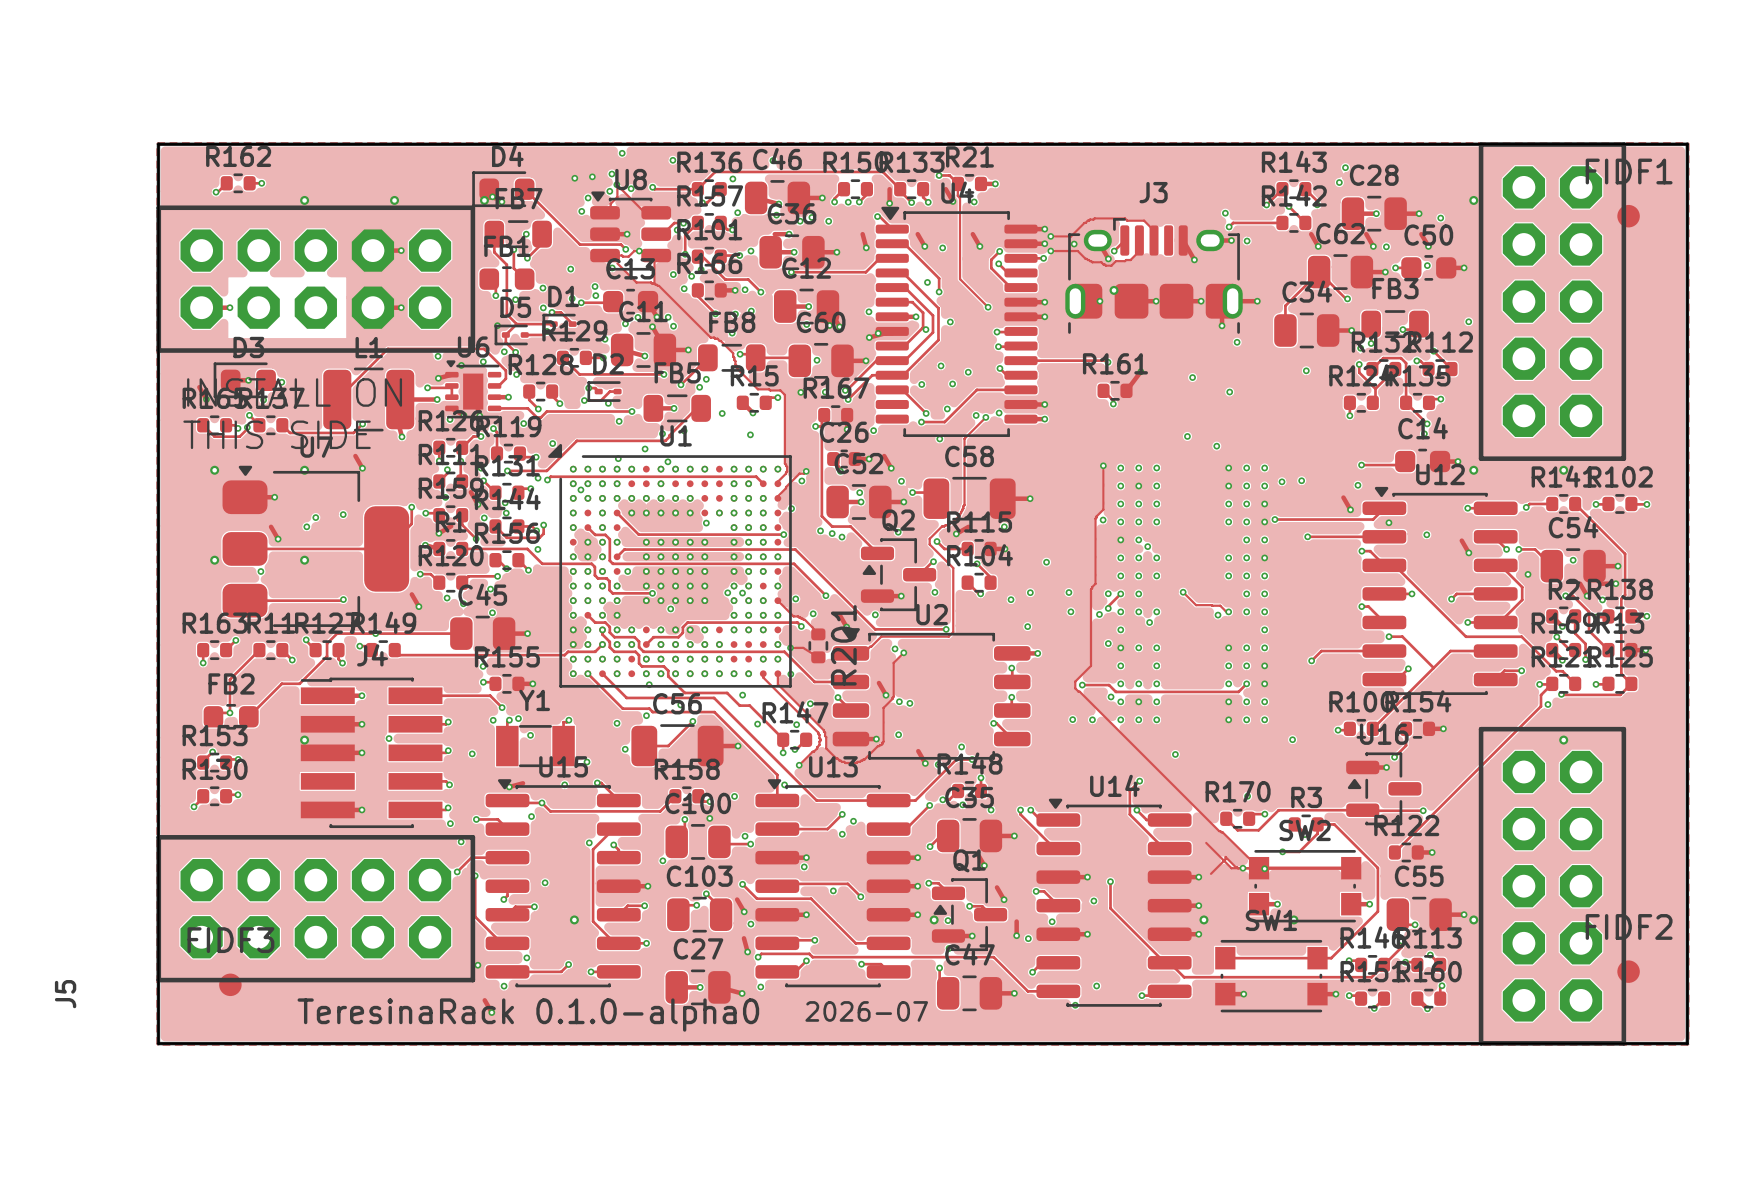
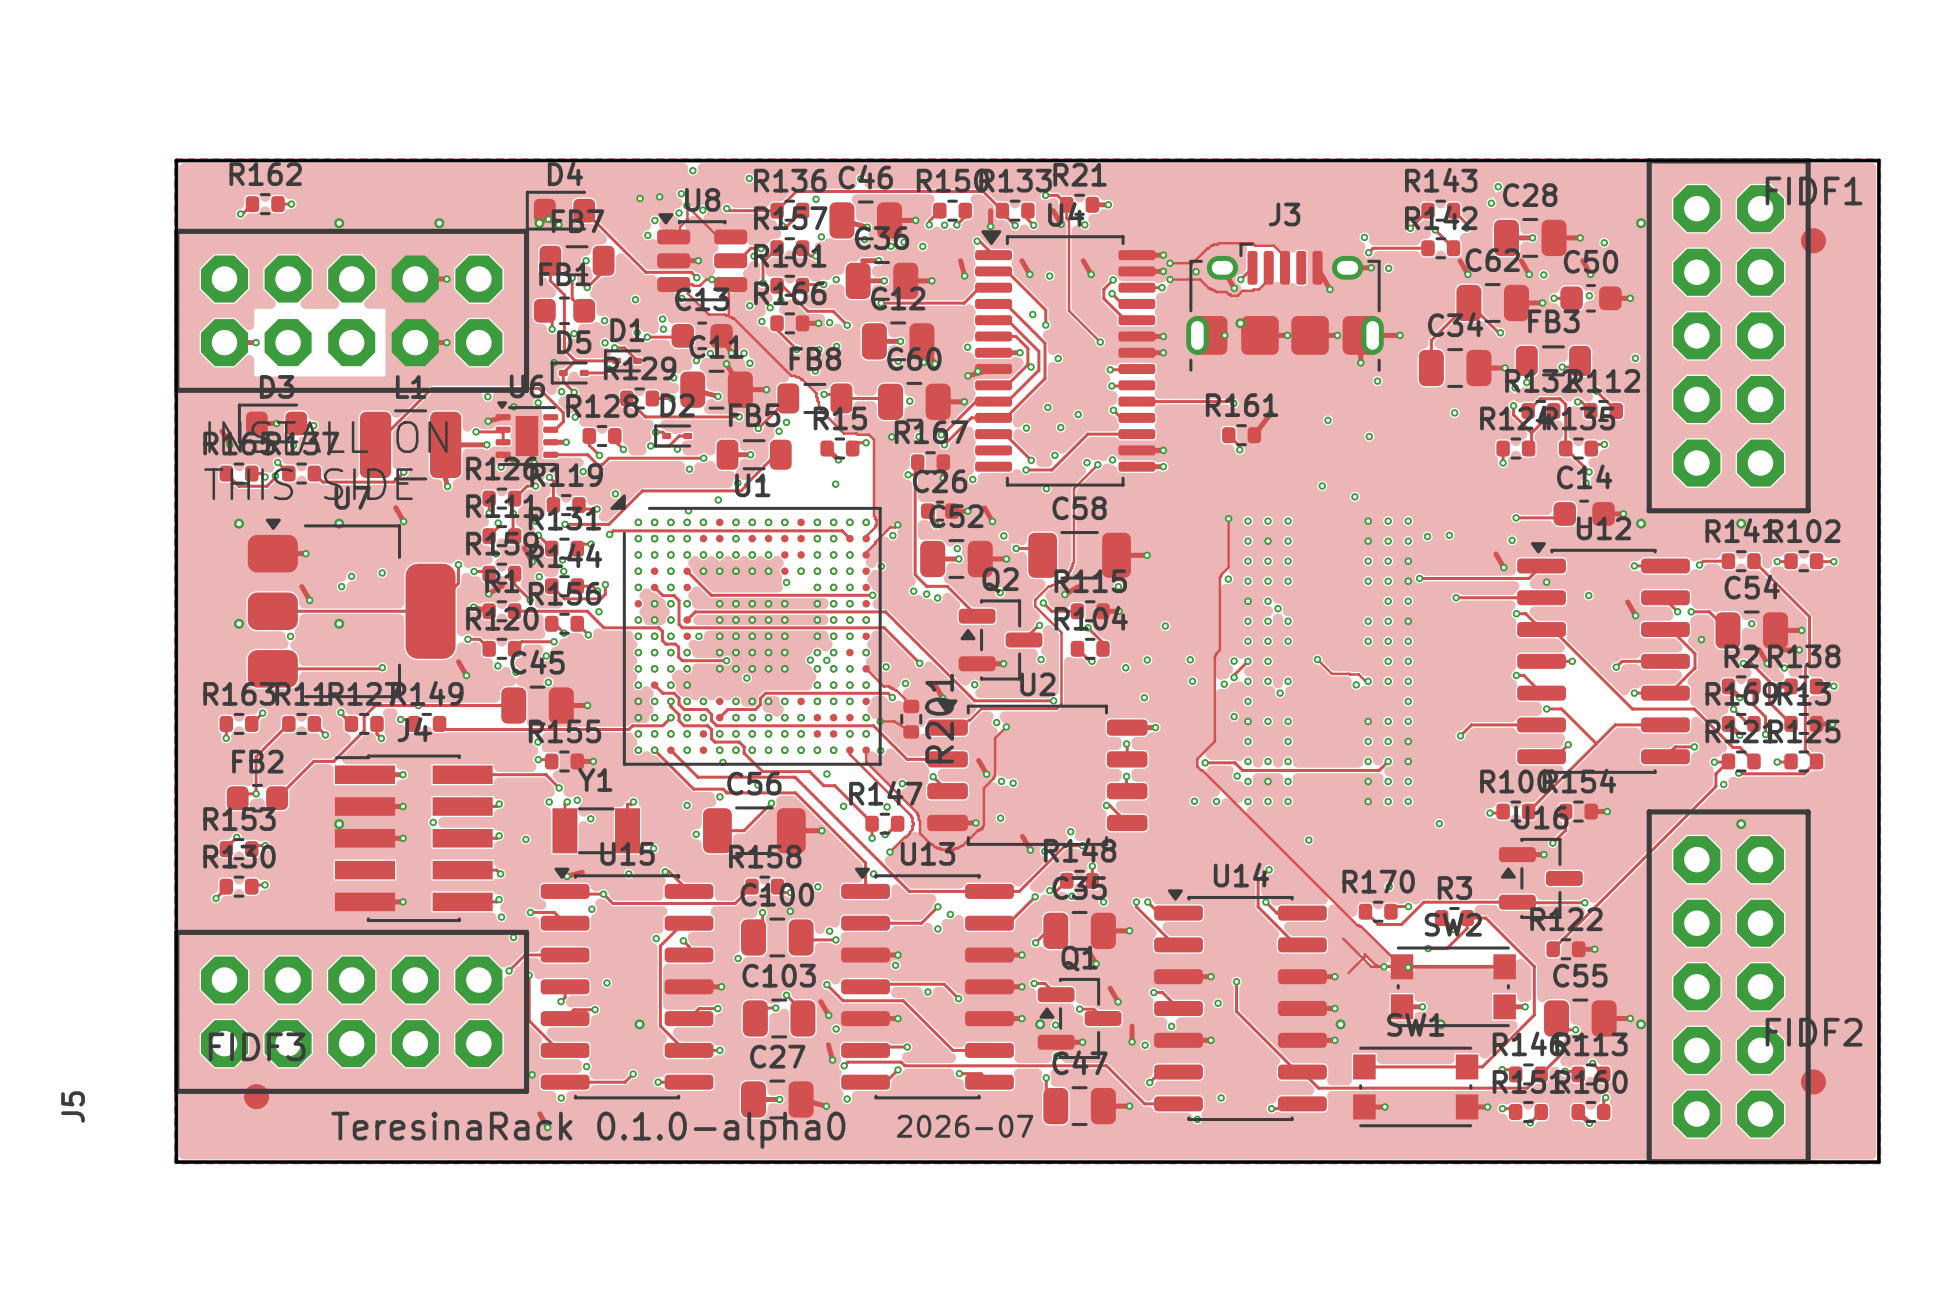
via: (722, 413) -> none
via: (667, 461) -> none
via: (538, 478) -> none
via: (580, 489) -> none

